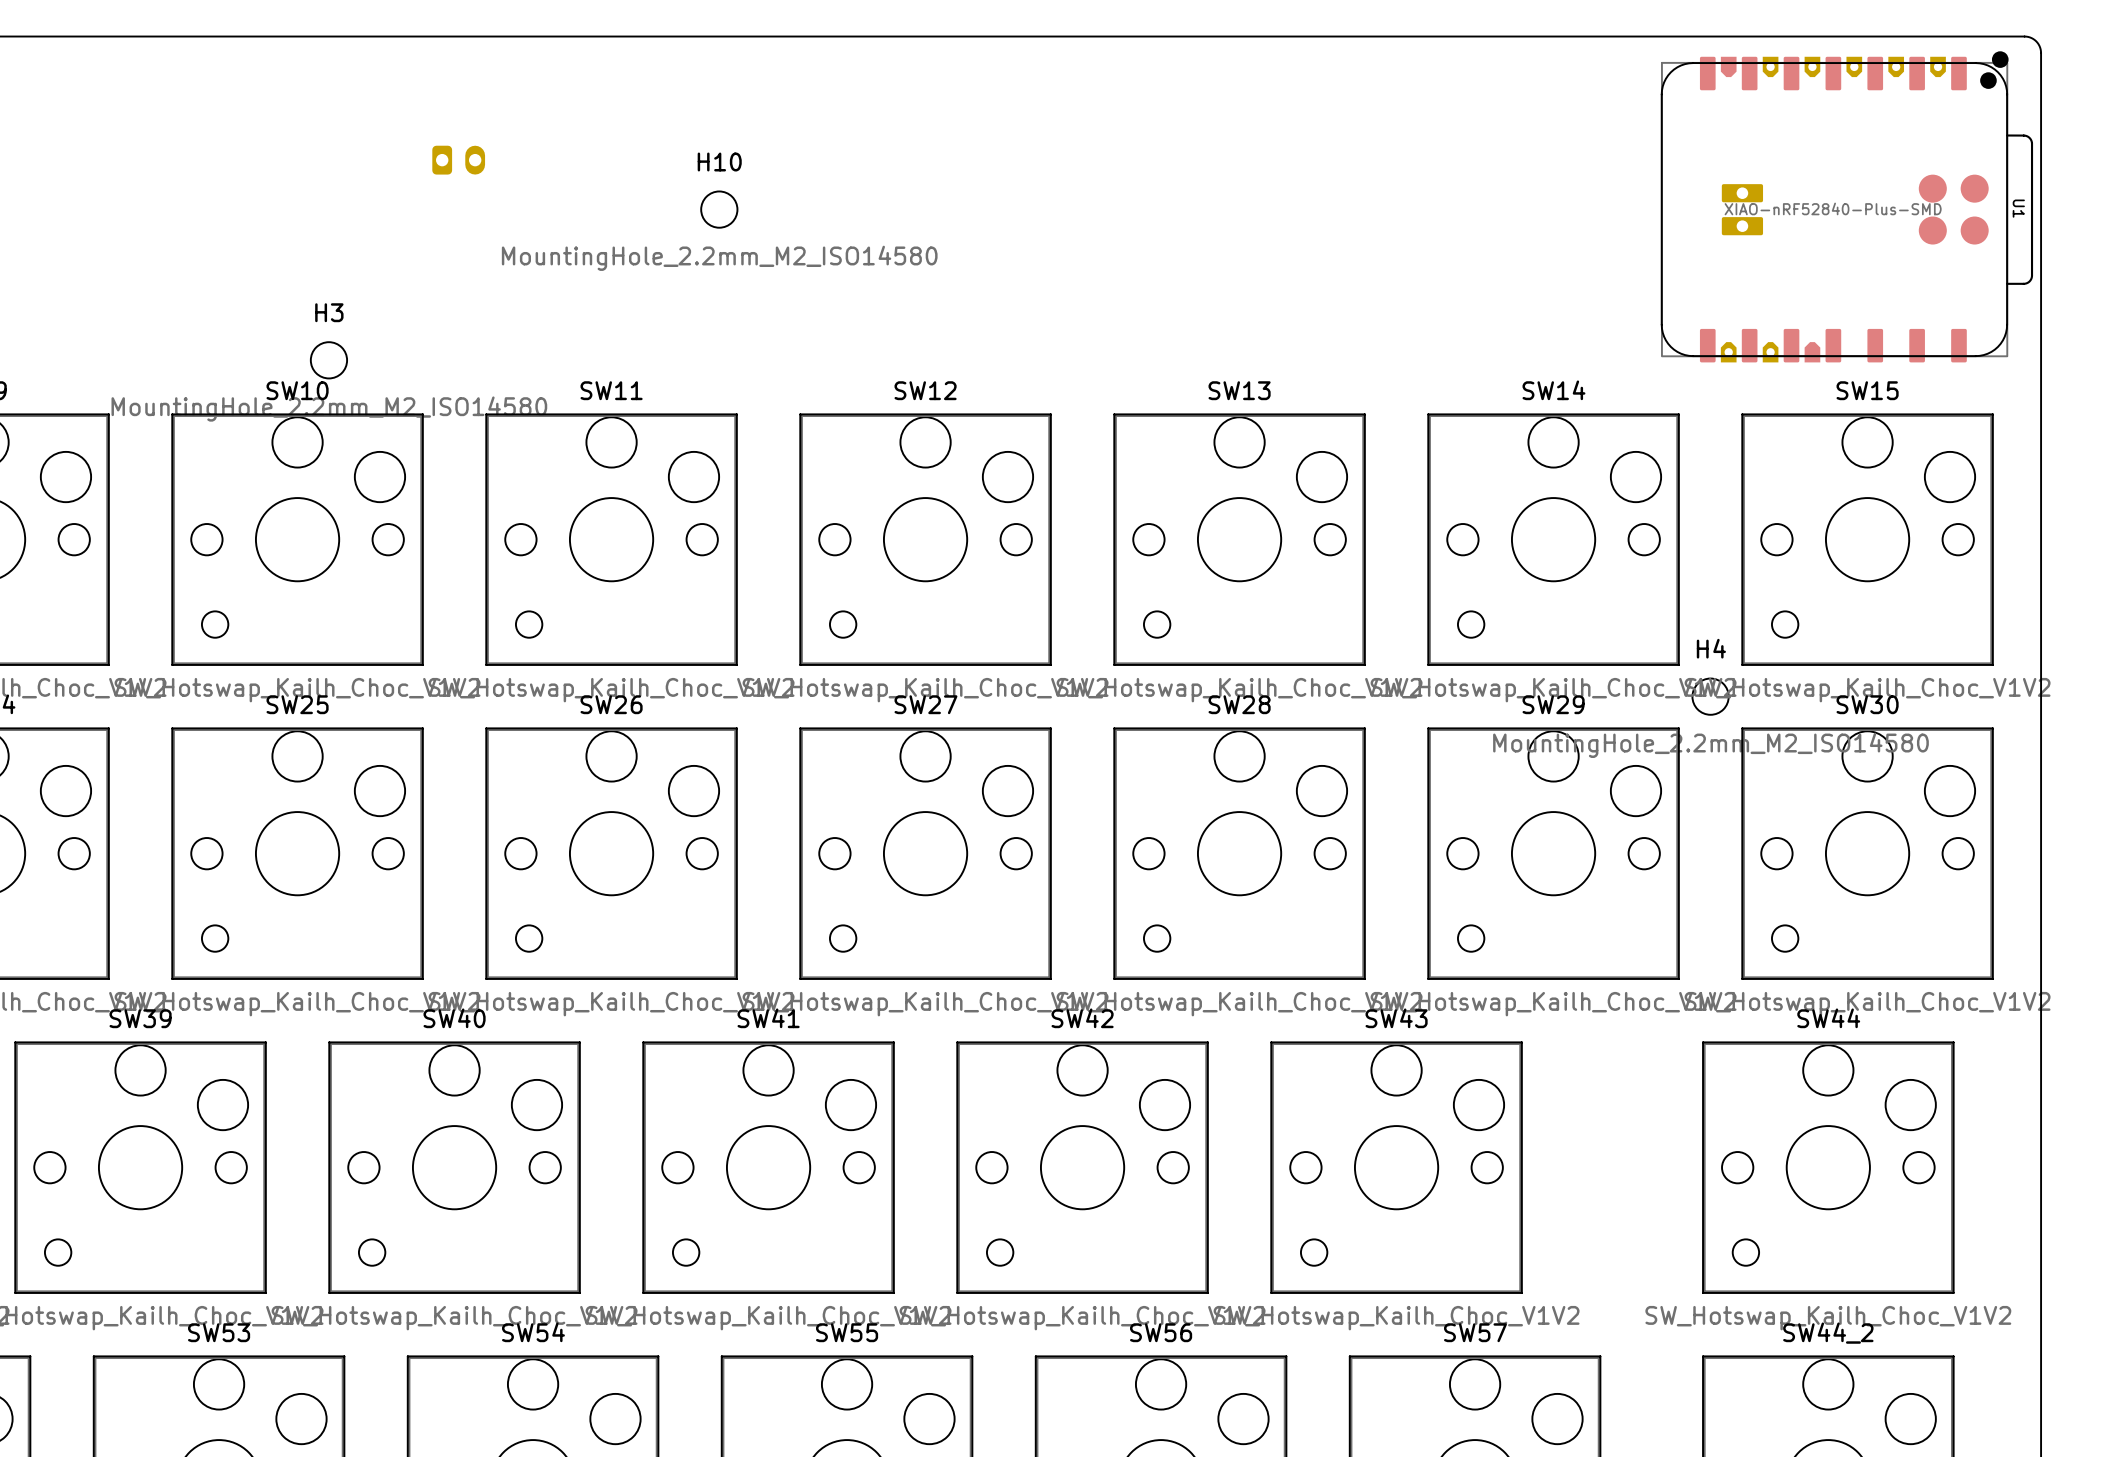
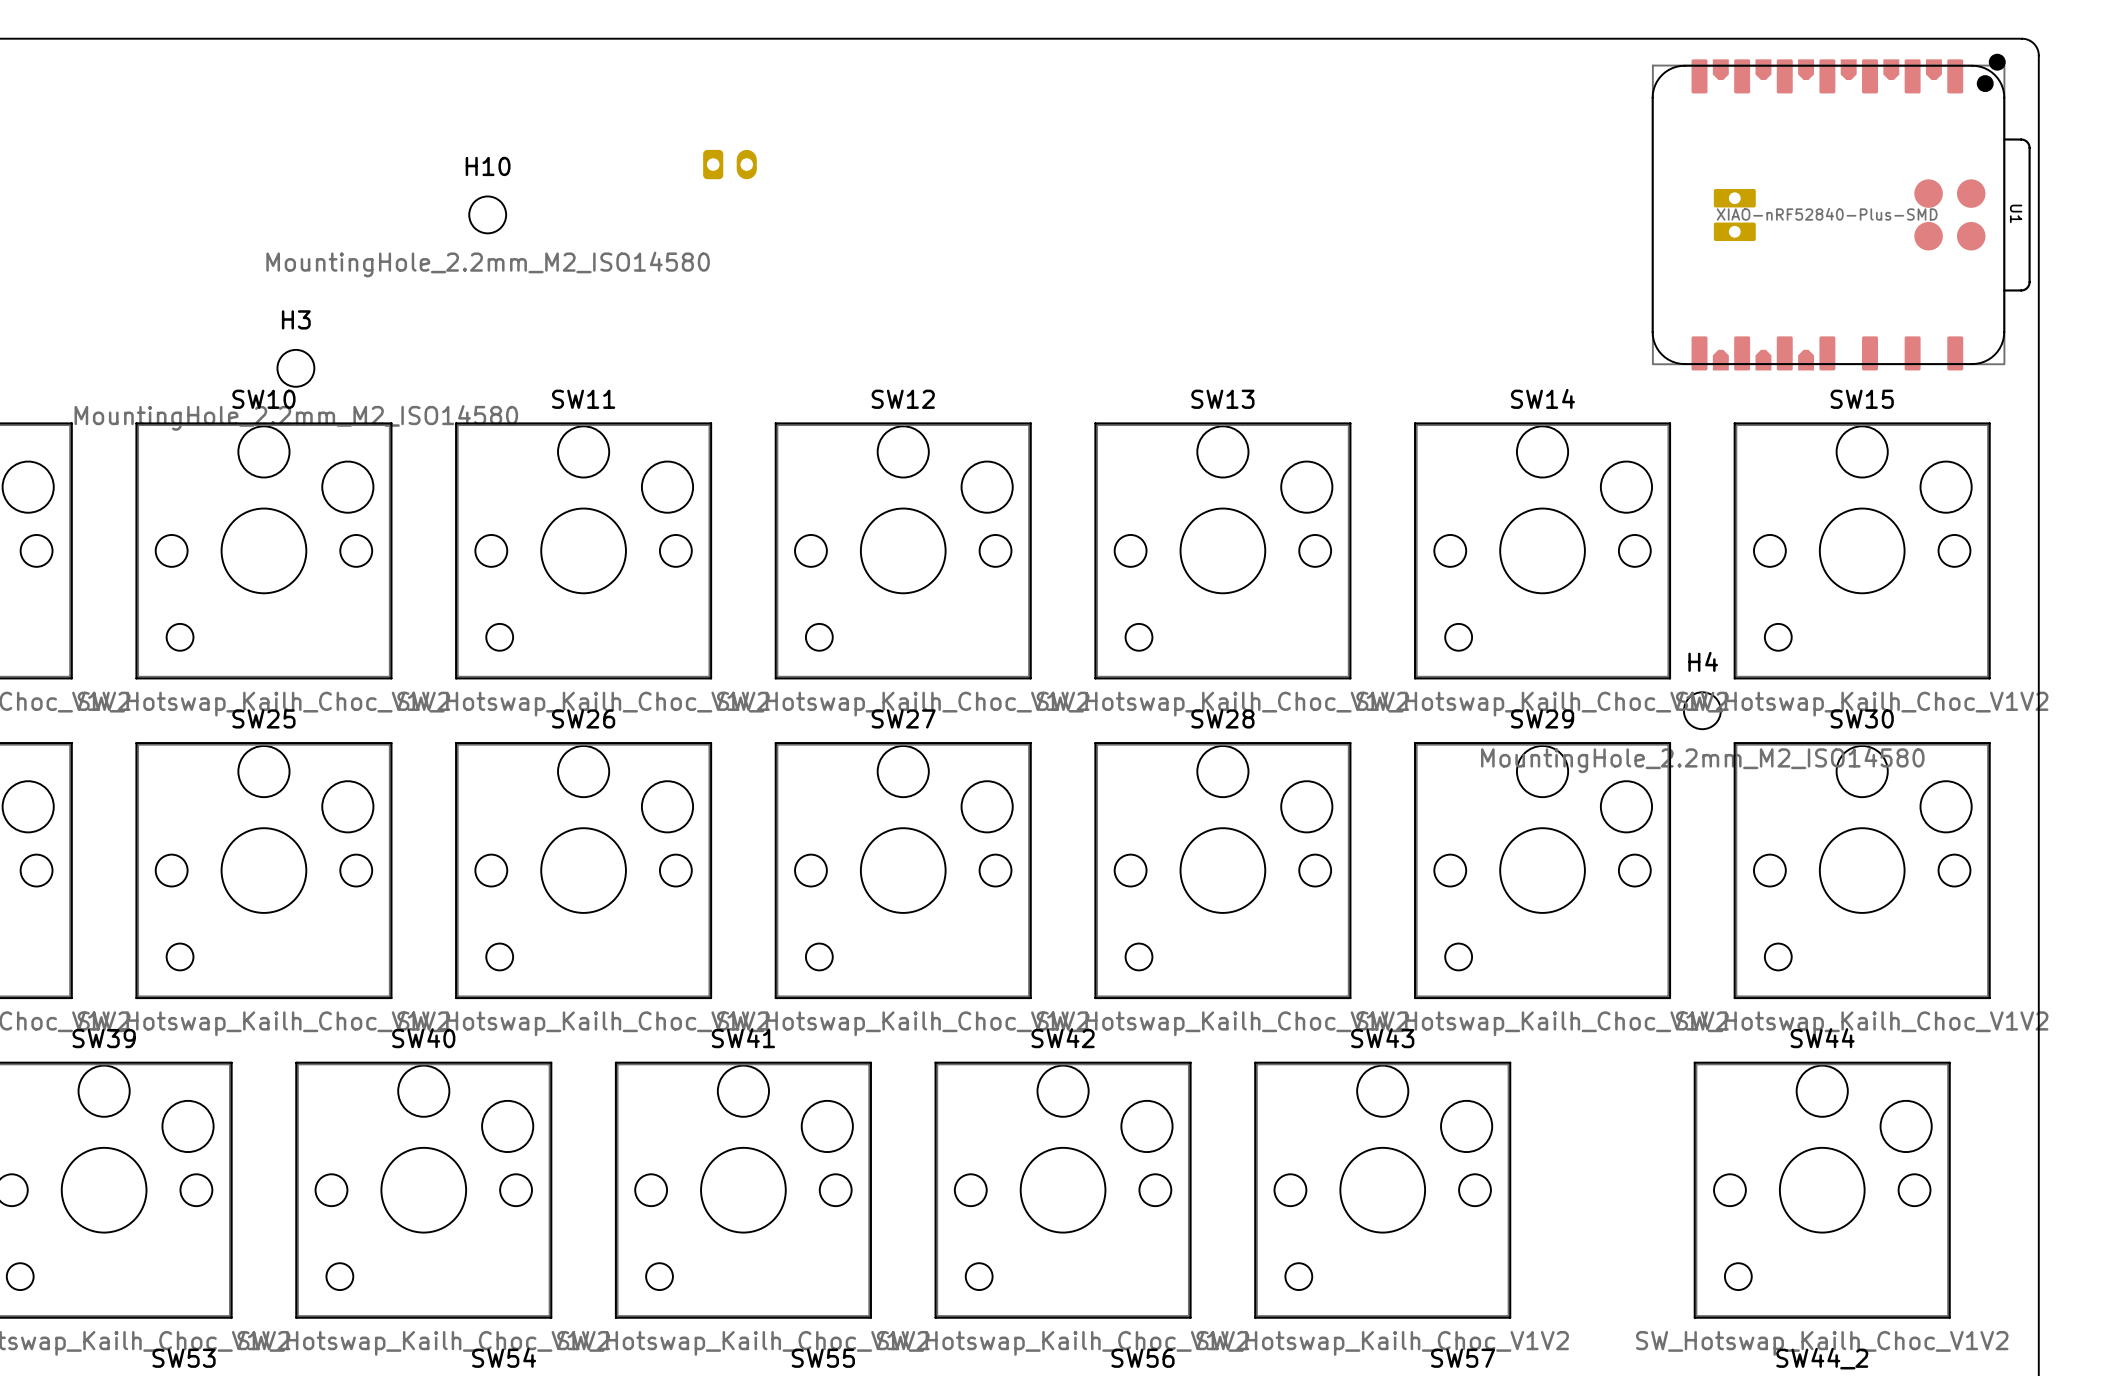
U1 footprint: [1660, 51, 2034, 363] -> [1651, 53, 2031, 371]
part position: (458, 160) -> (730, 164)
H10 position: (719, 209) -> (487, 214)

